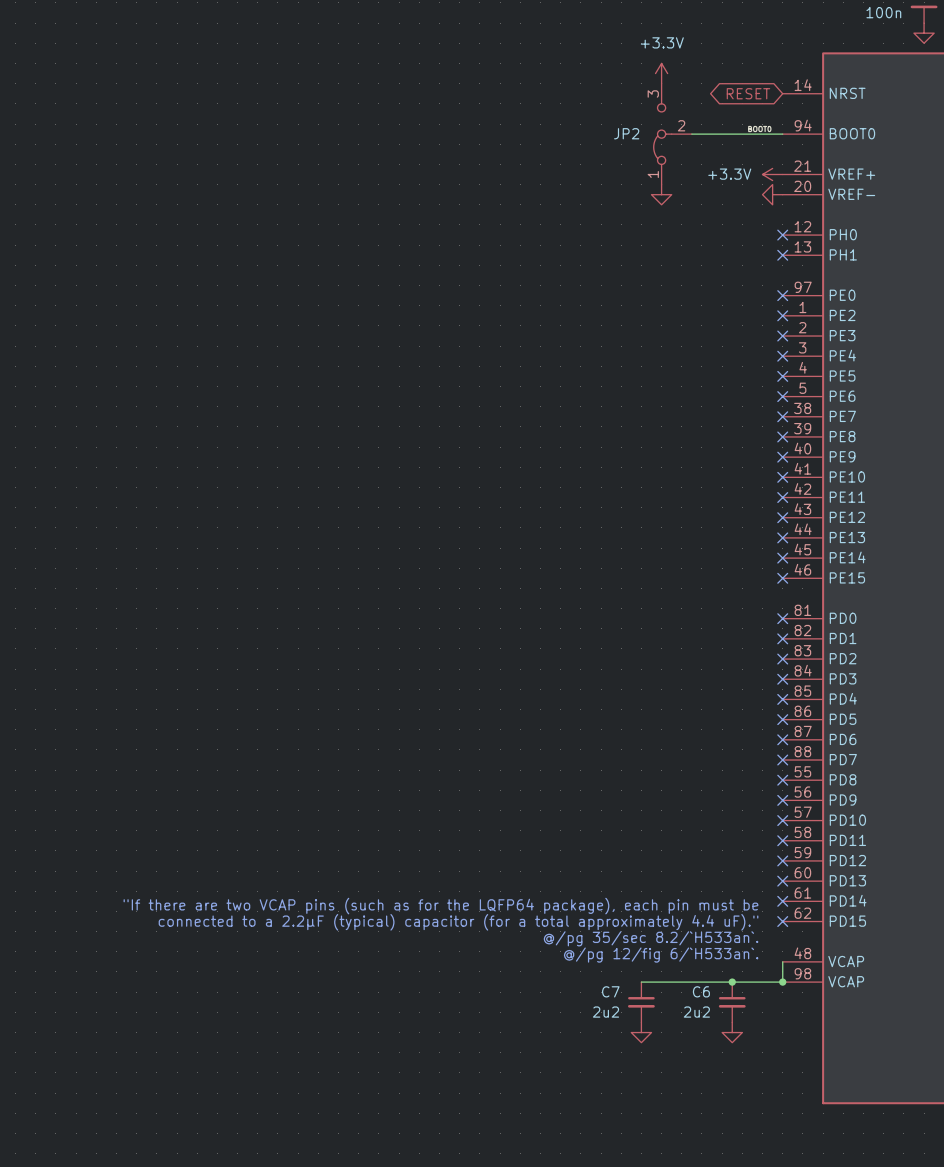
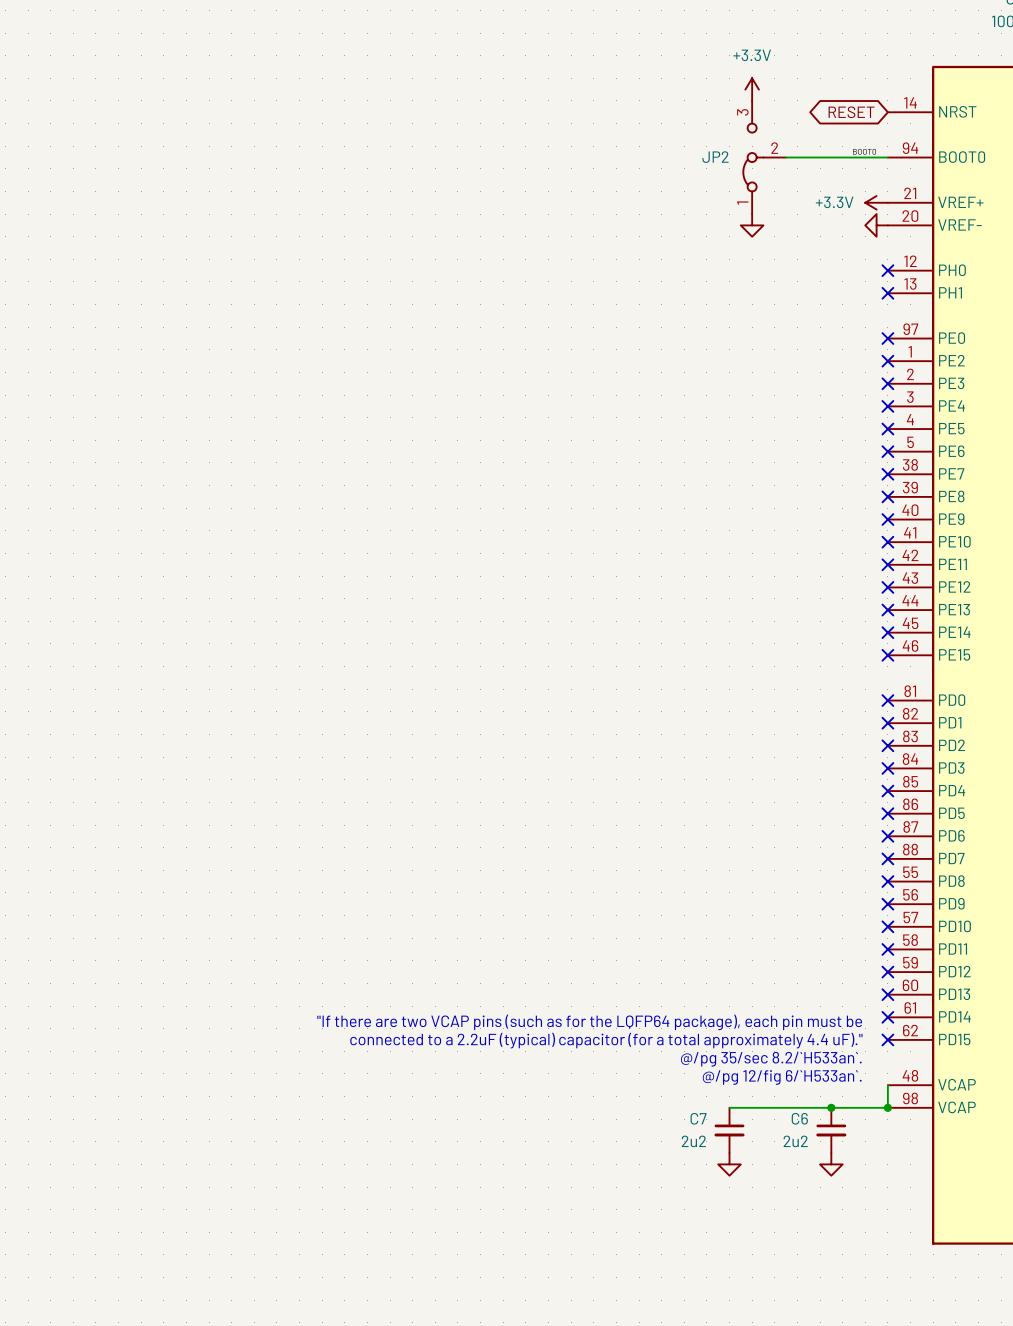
text: connected to a 2.2μF (typical) capacitor (for a total approximately 4.4 uF)." (458, 922) -> connected to a 2.2uF (typical) capacitor (for a total approximately 4.4 uF)." (606, 1040)

